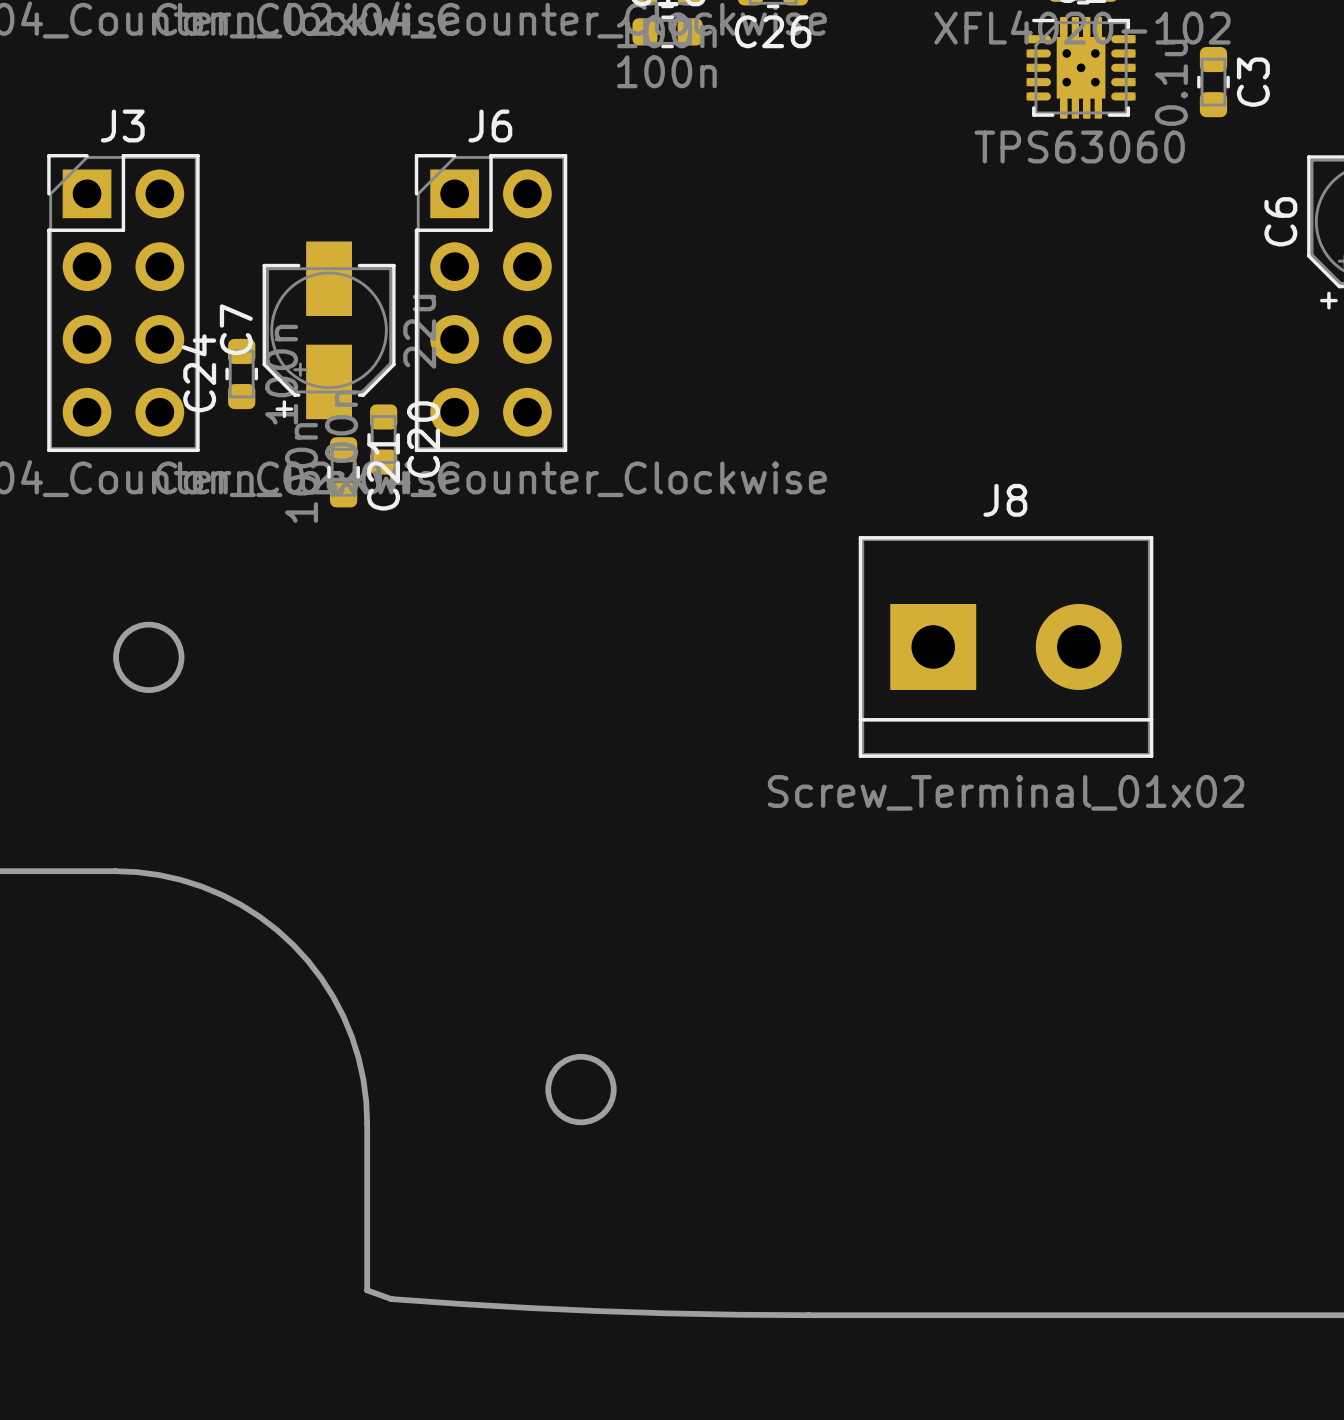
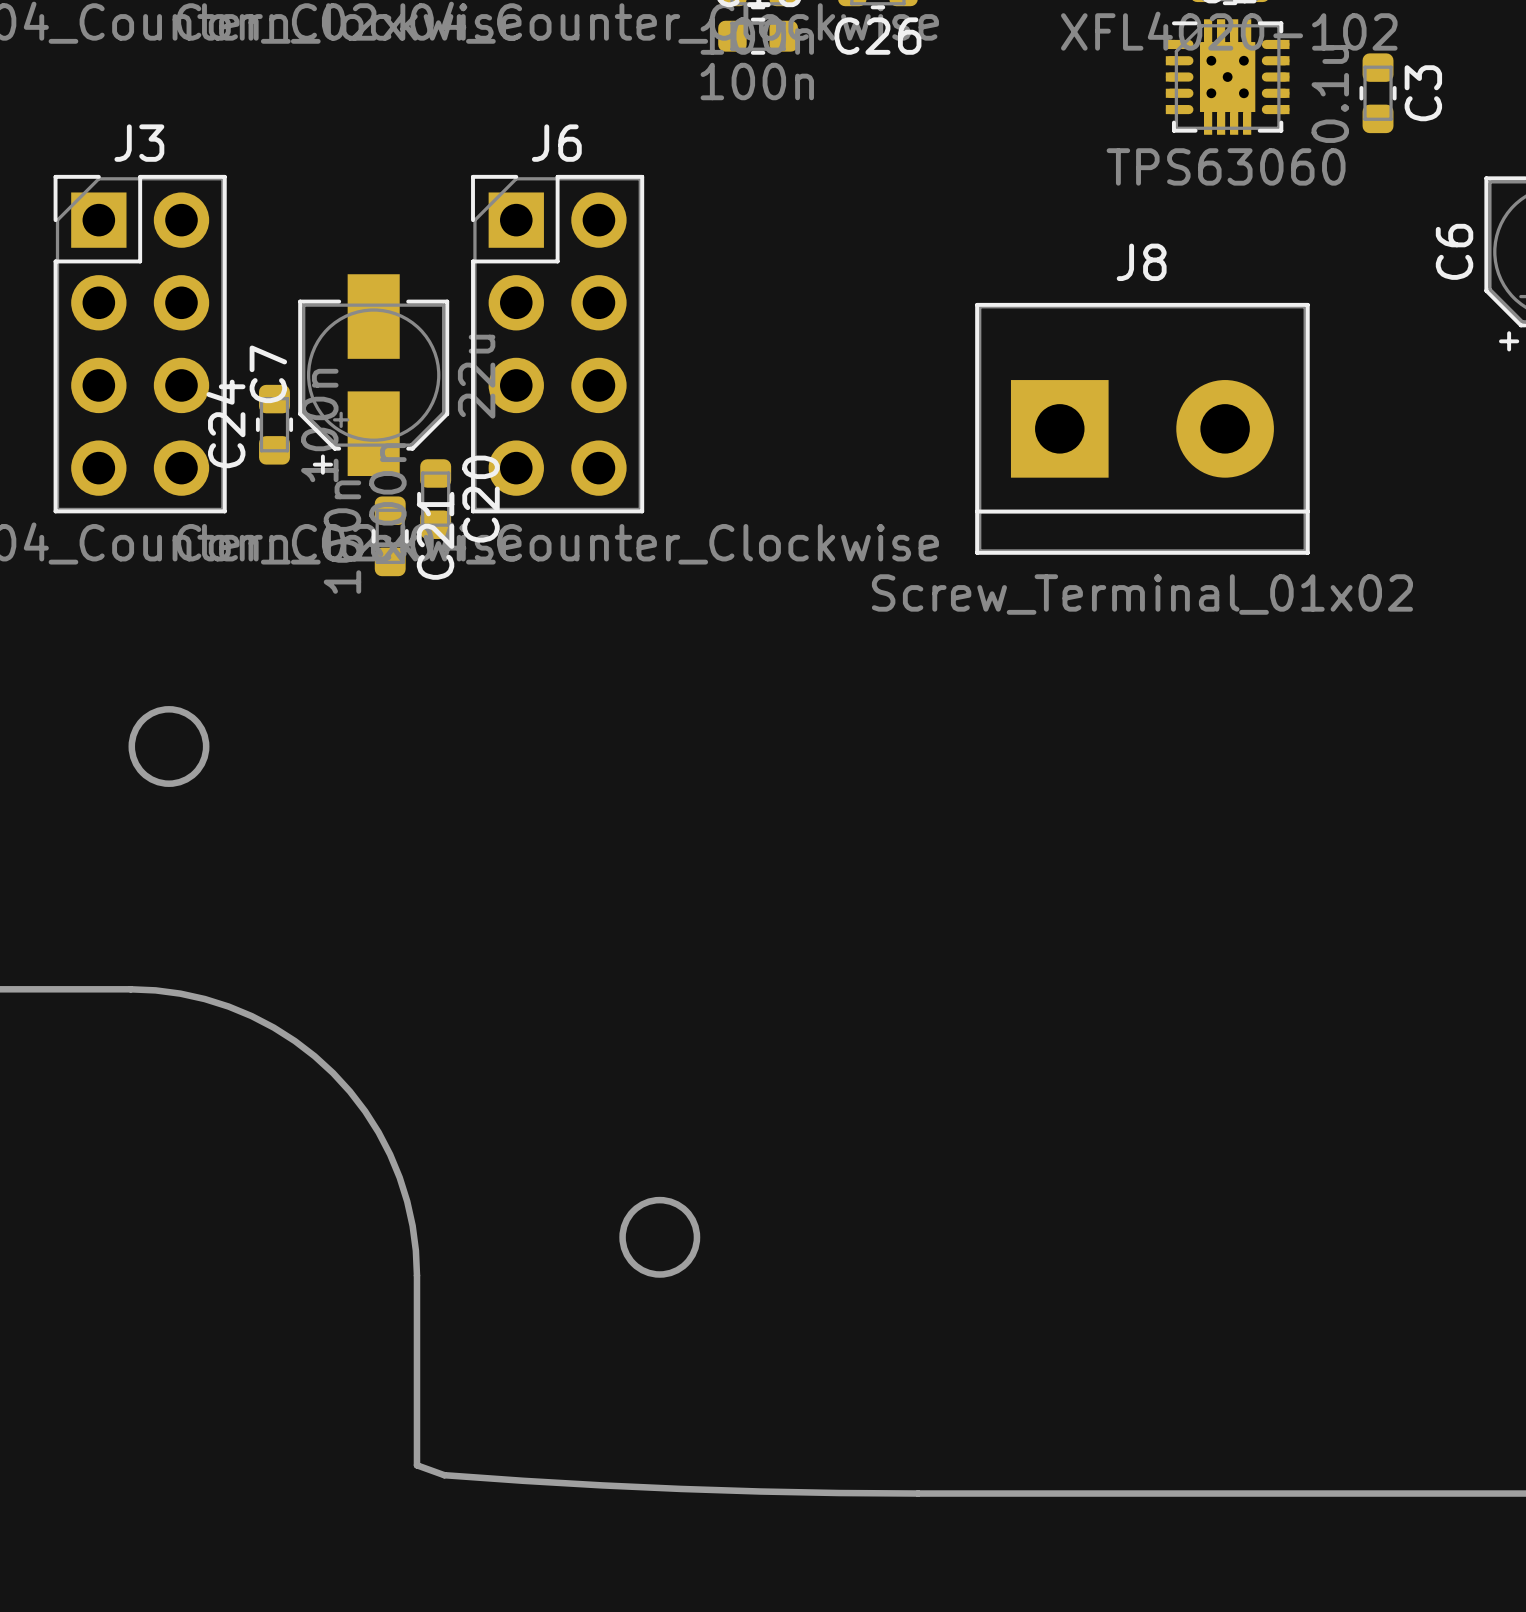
J8 position: (1006, 646) -> (1142, 428)

